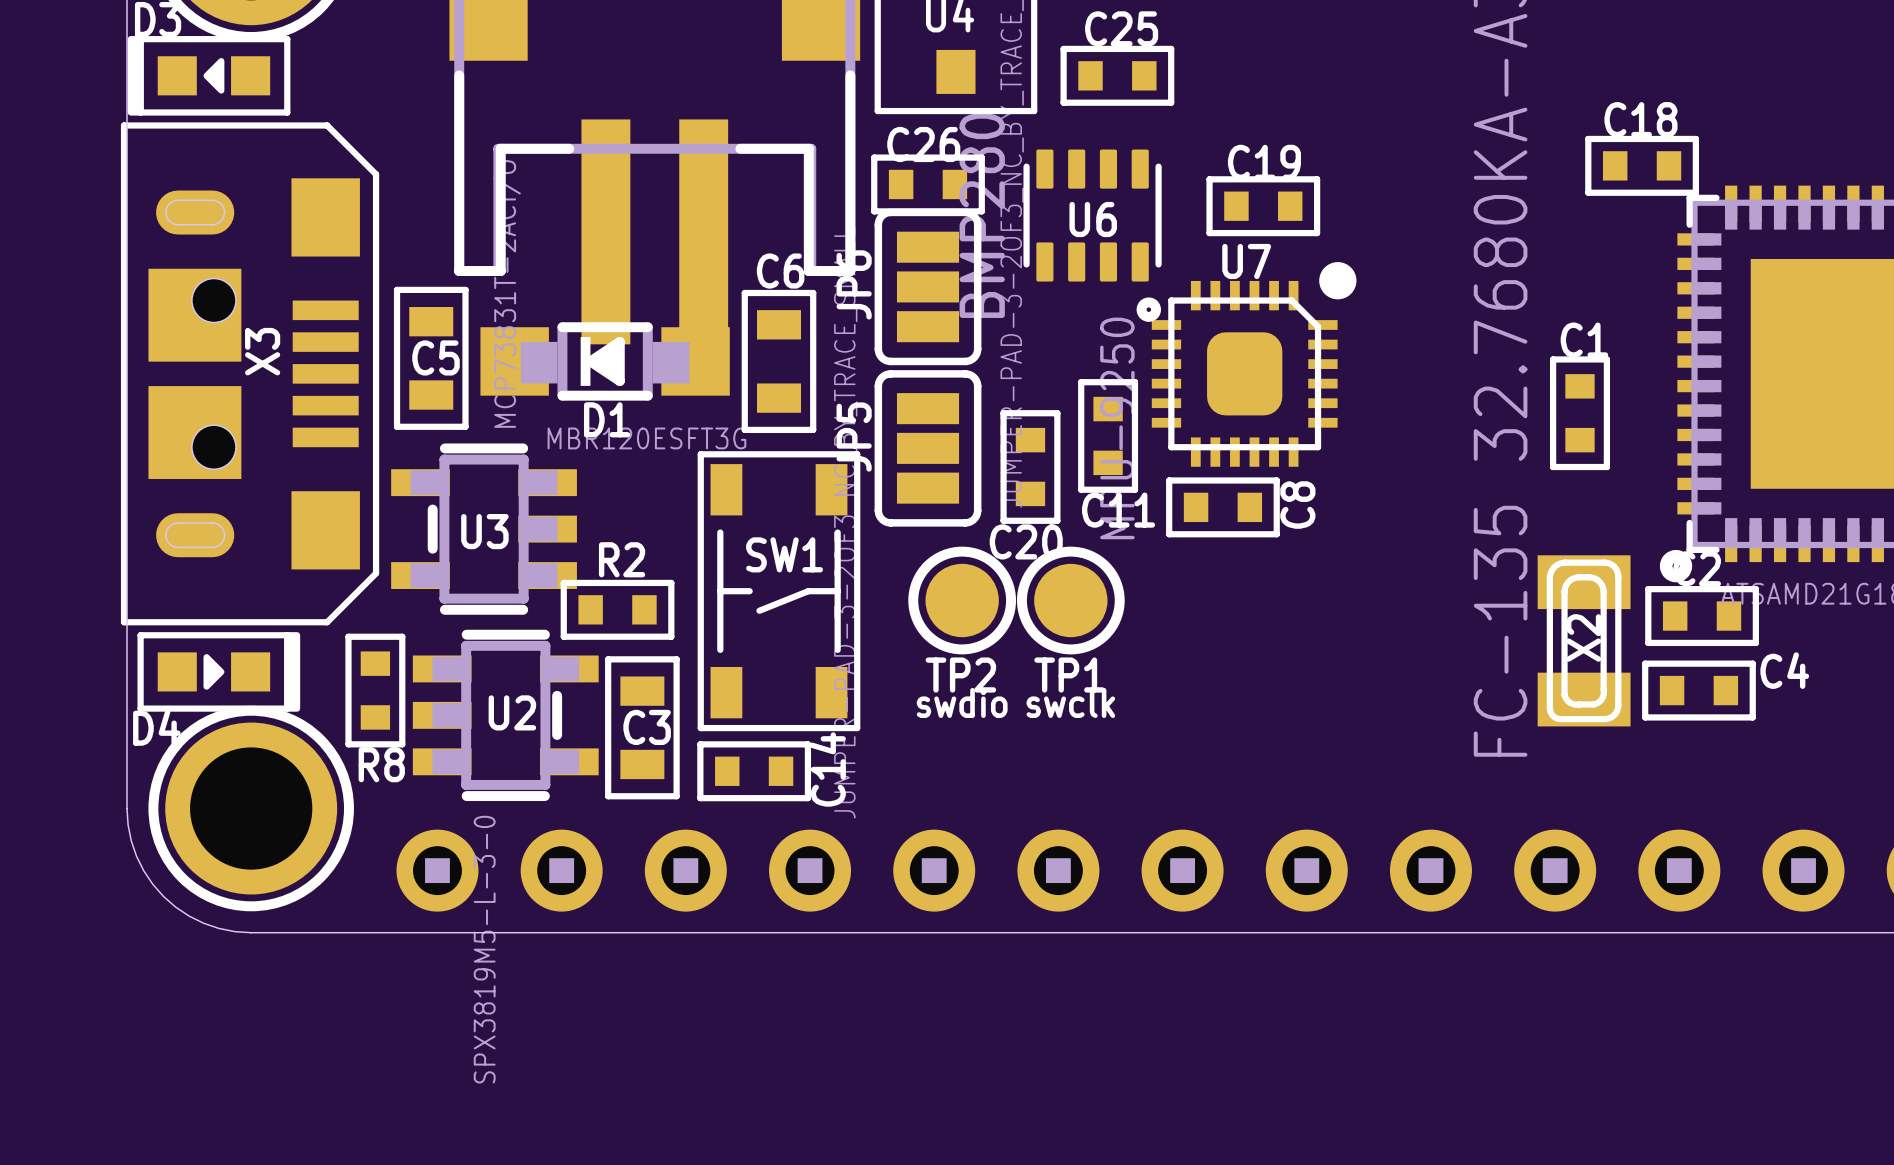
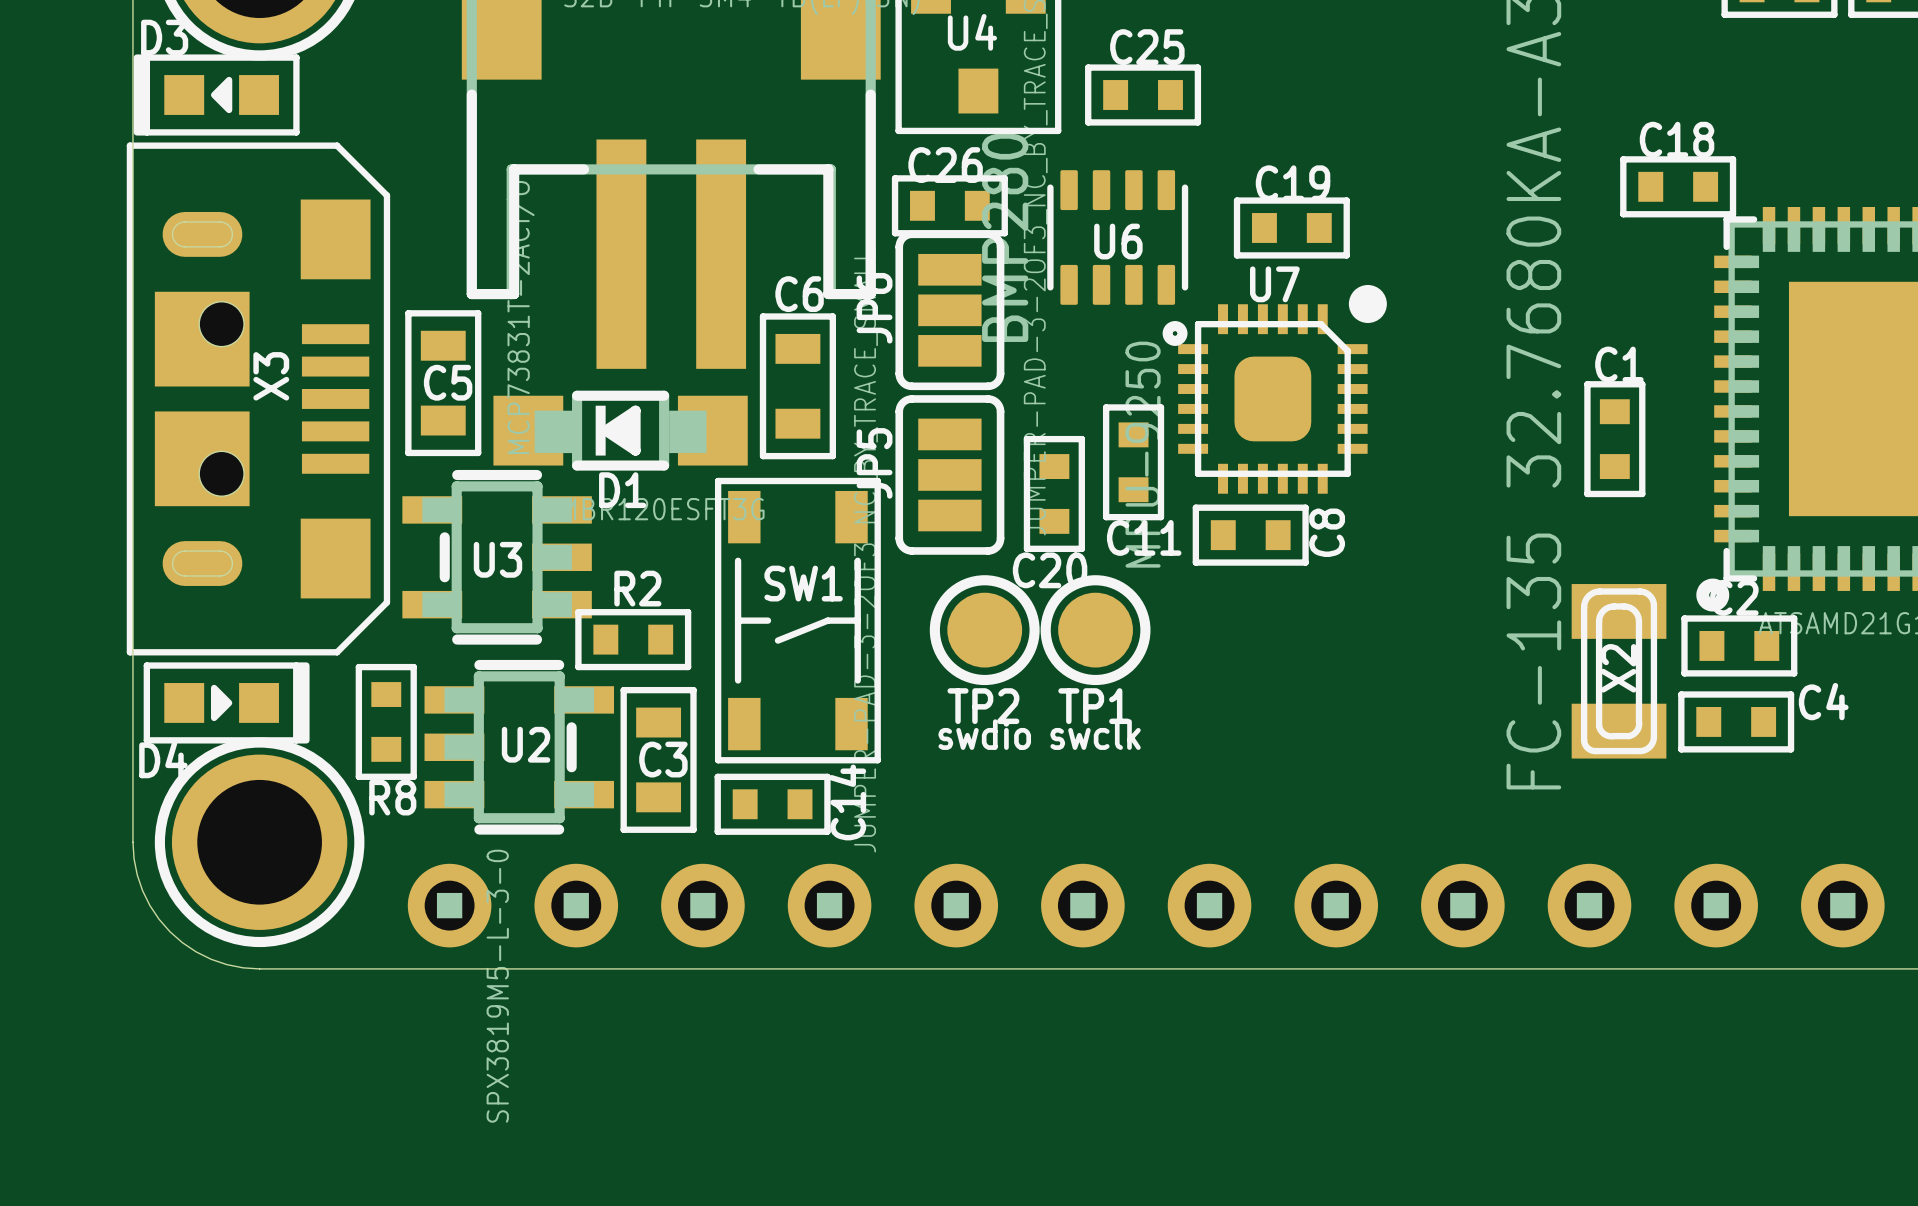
D1 position: (605, 361) -> (620, 430)

